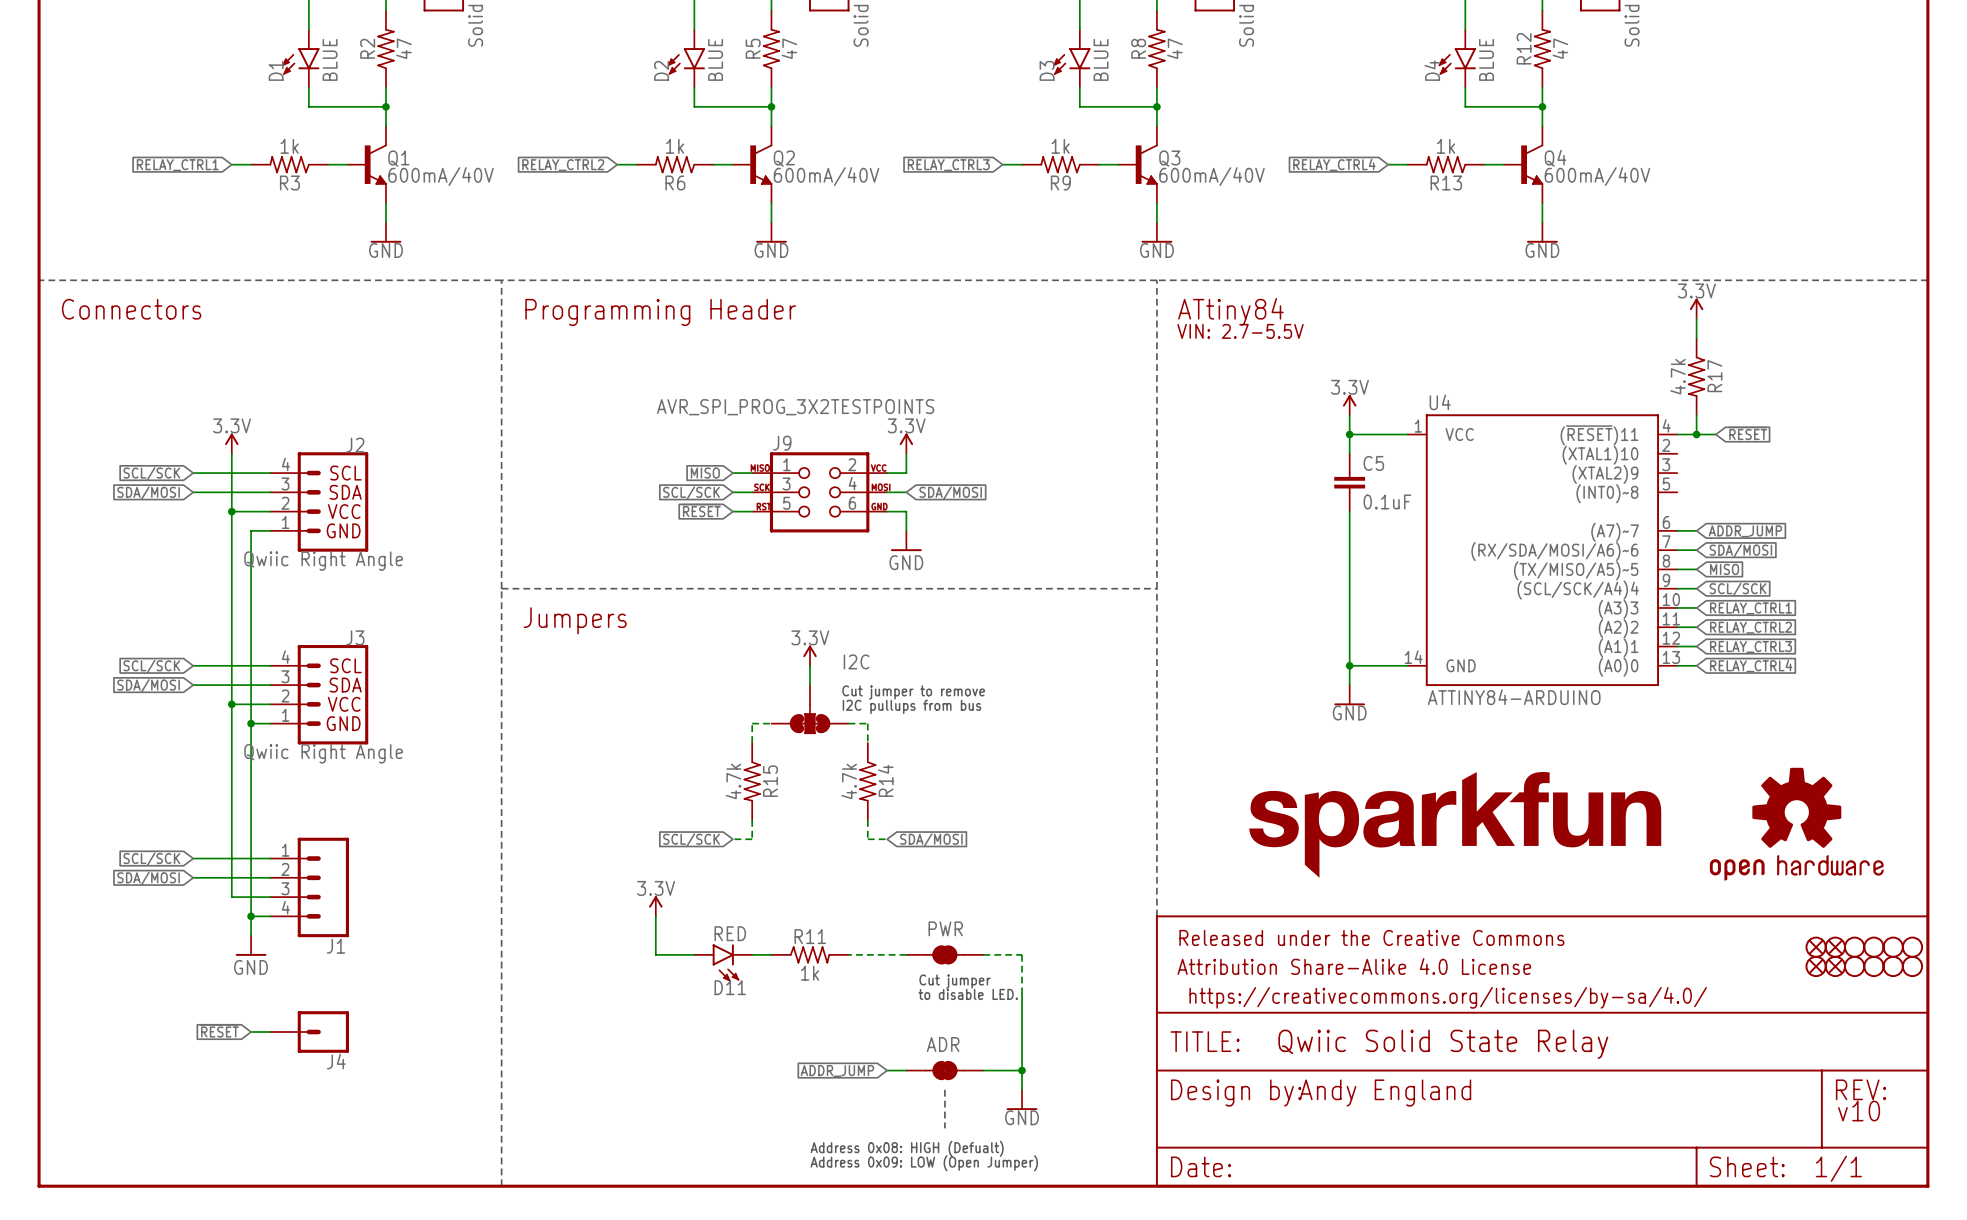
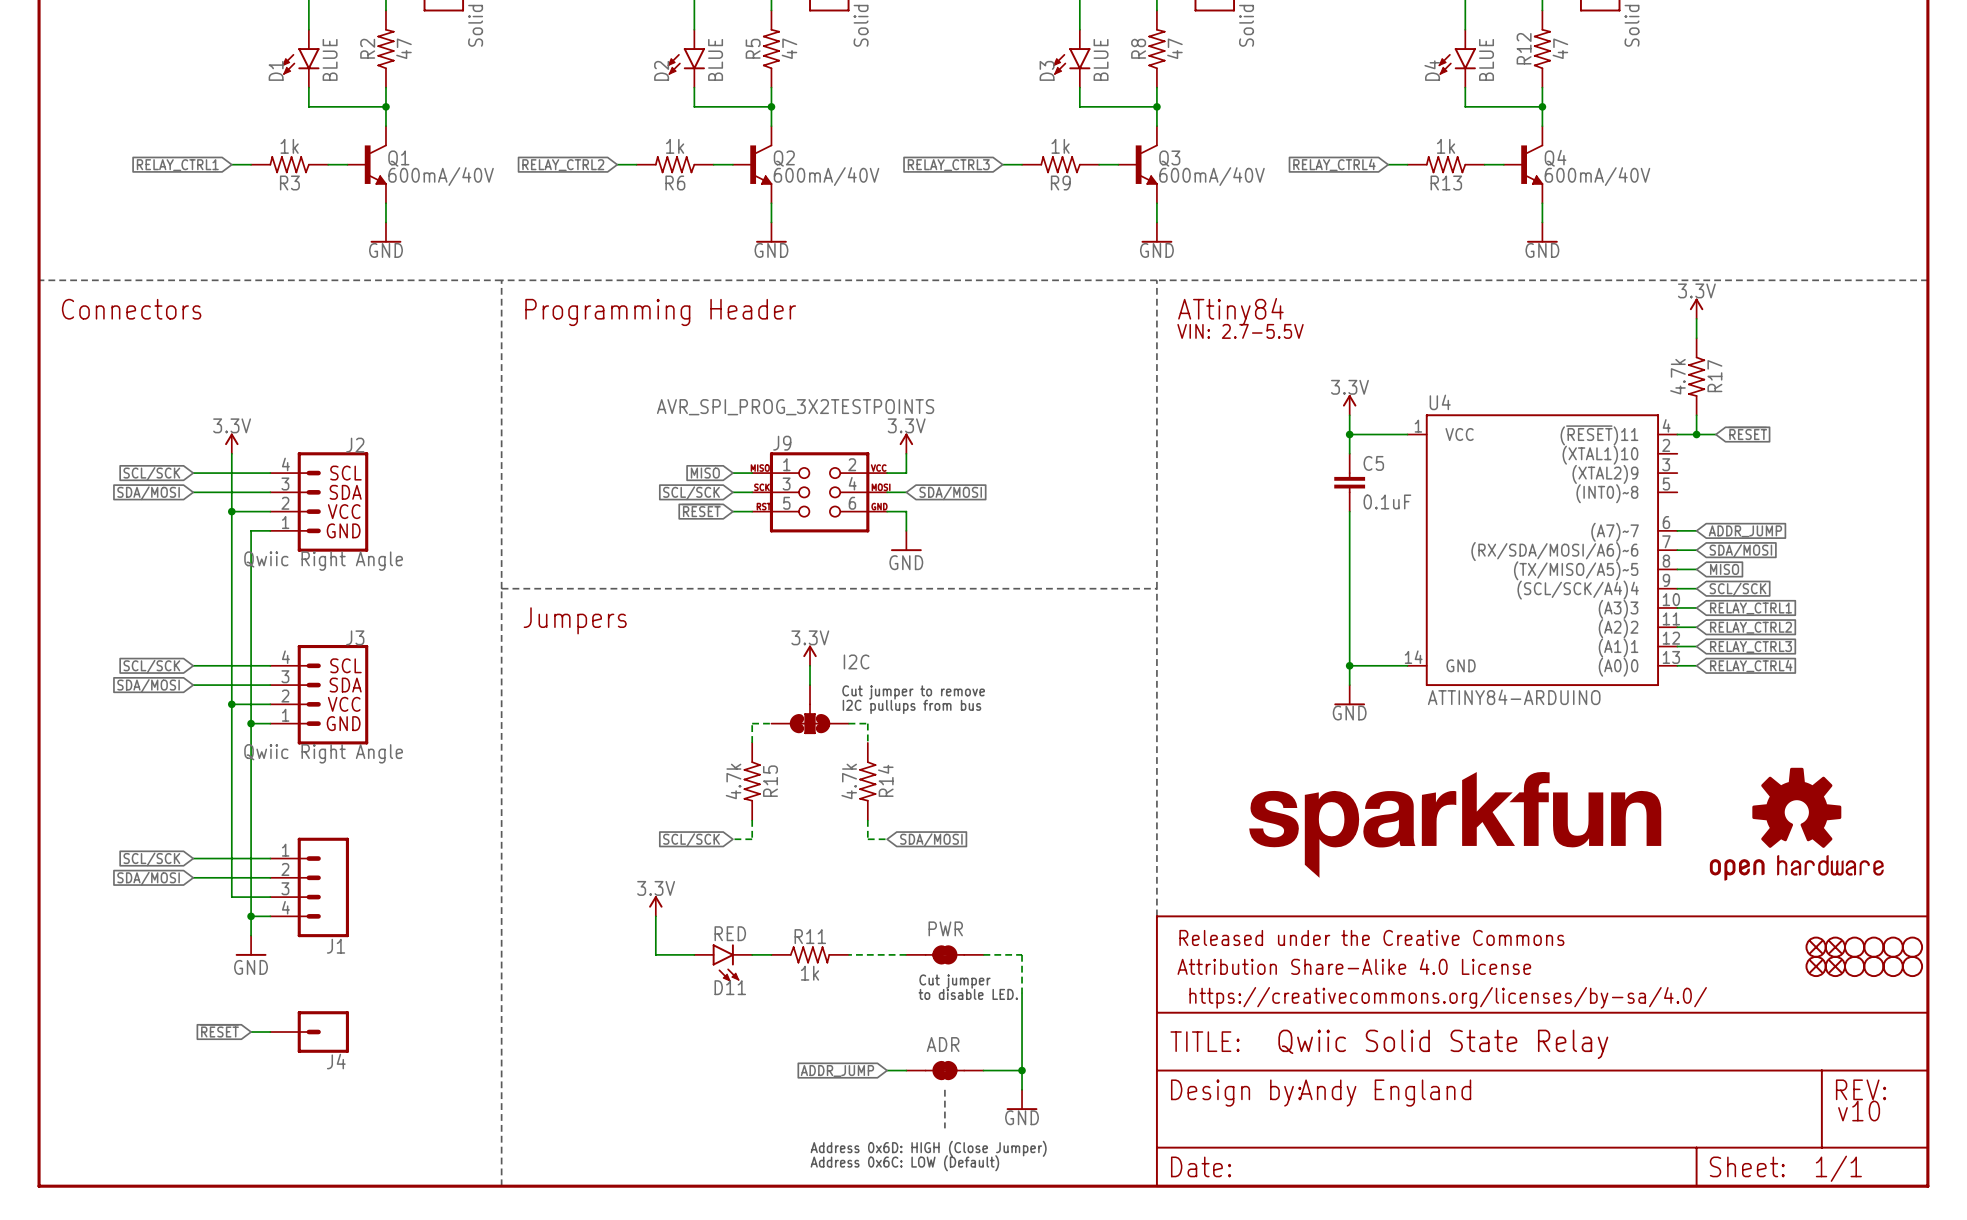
text: Address 0x08: HIGH (Defualt) (907, 1148) -> Address 0x6D: HIGH (Close Jumper) (928, 1148)
text: Address 0x09: LOW (Open Jumper) (924, 1163) -> Address 0x6C: LOW (Default) (904, 1163)

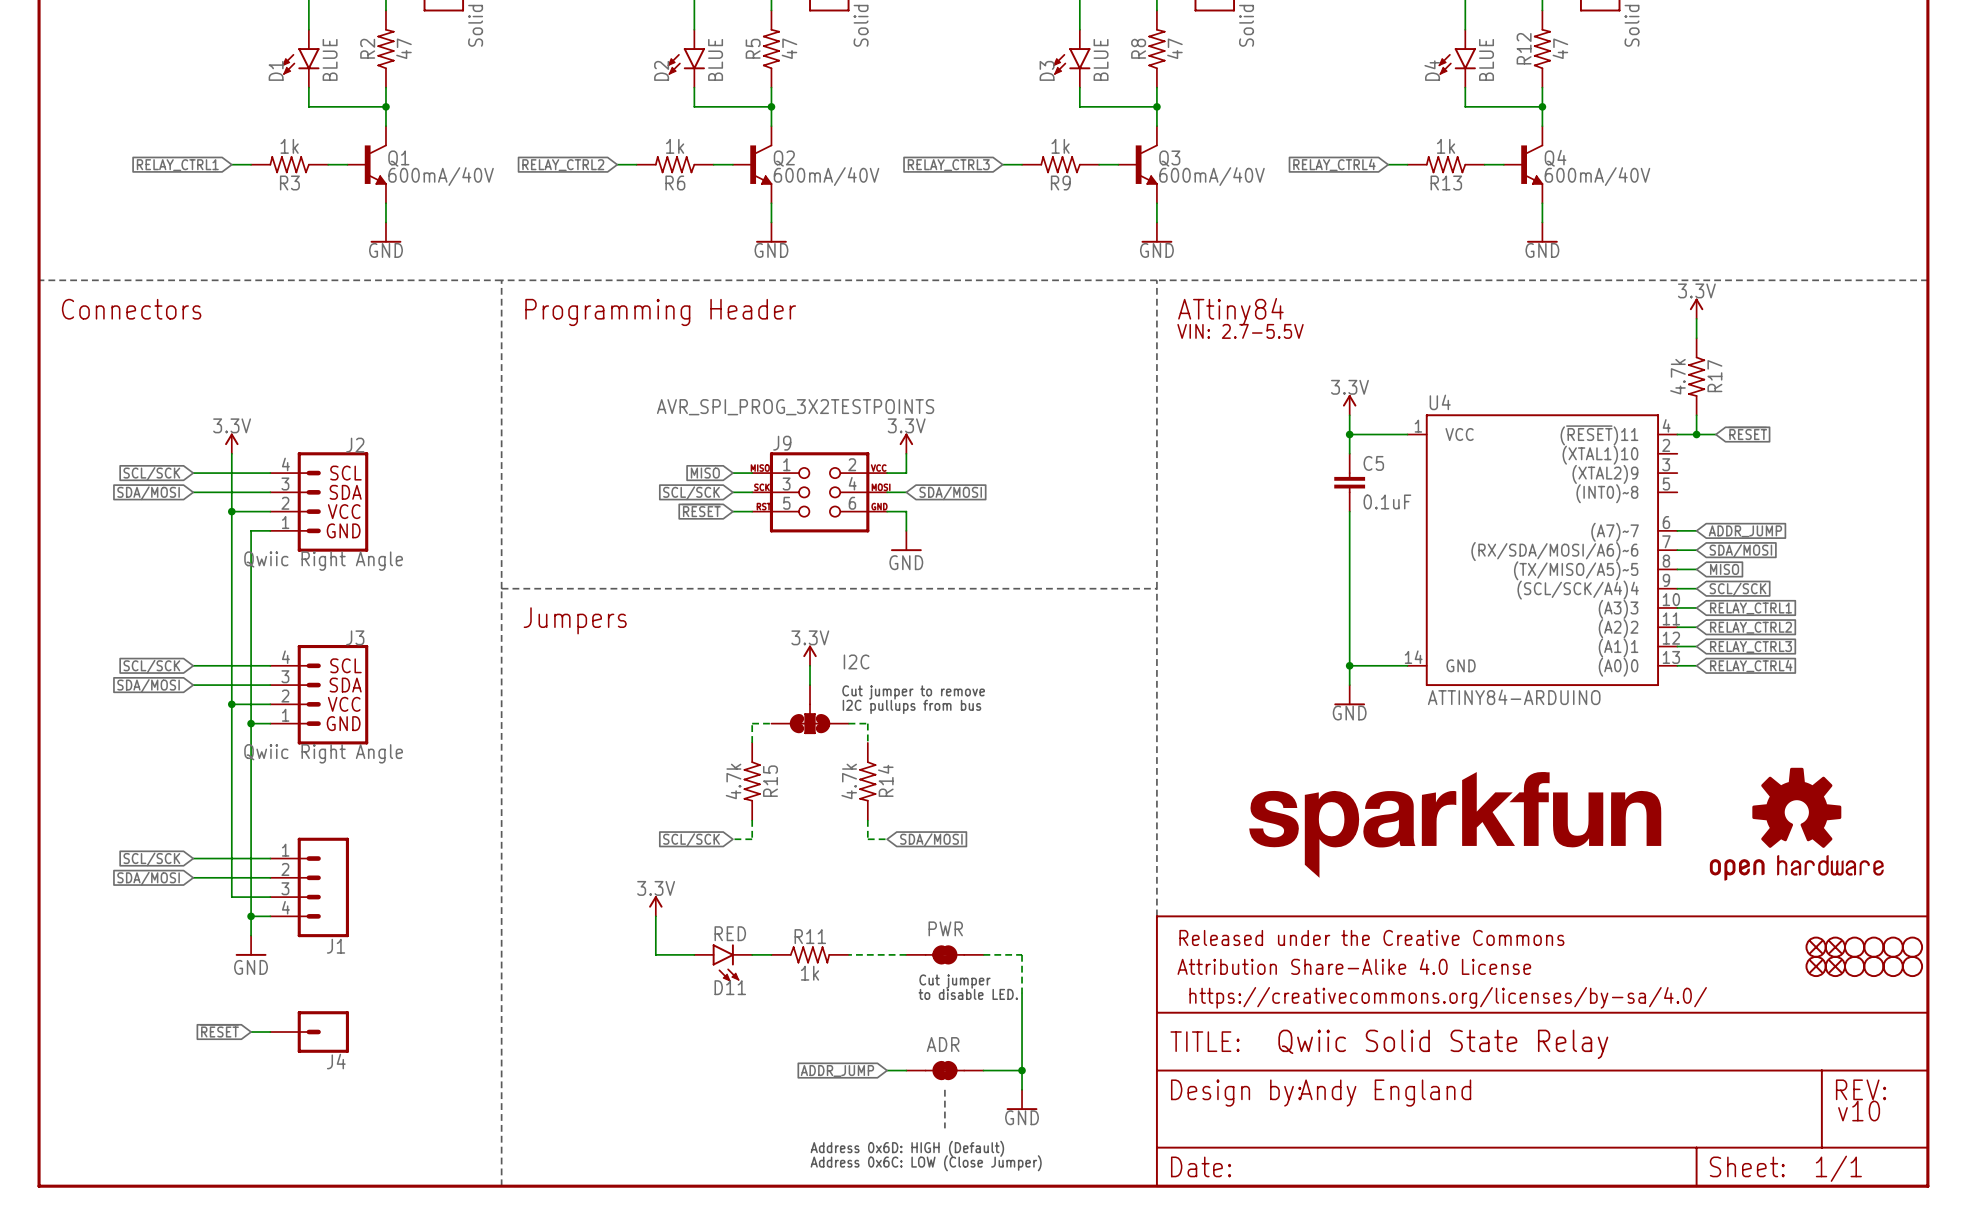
text: Address 0x6D: HIGH (Close Jumper) (928, 1148) -> Address 0x6D: HIGH (Default) (907, 1148)
text: Address 0x6C: LOW (Default) (904, 1163) -> Address 0x6C: LOW (Close Jumper) (926, 1163)

